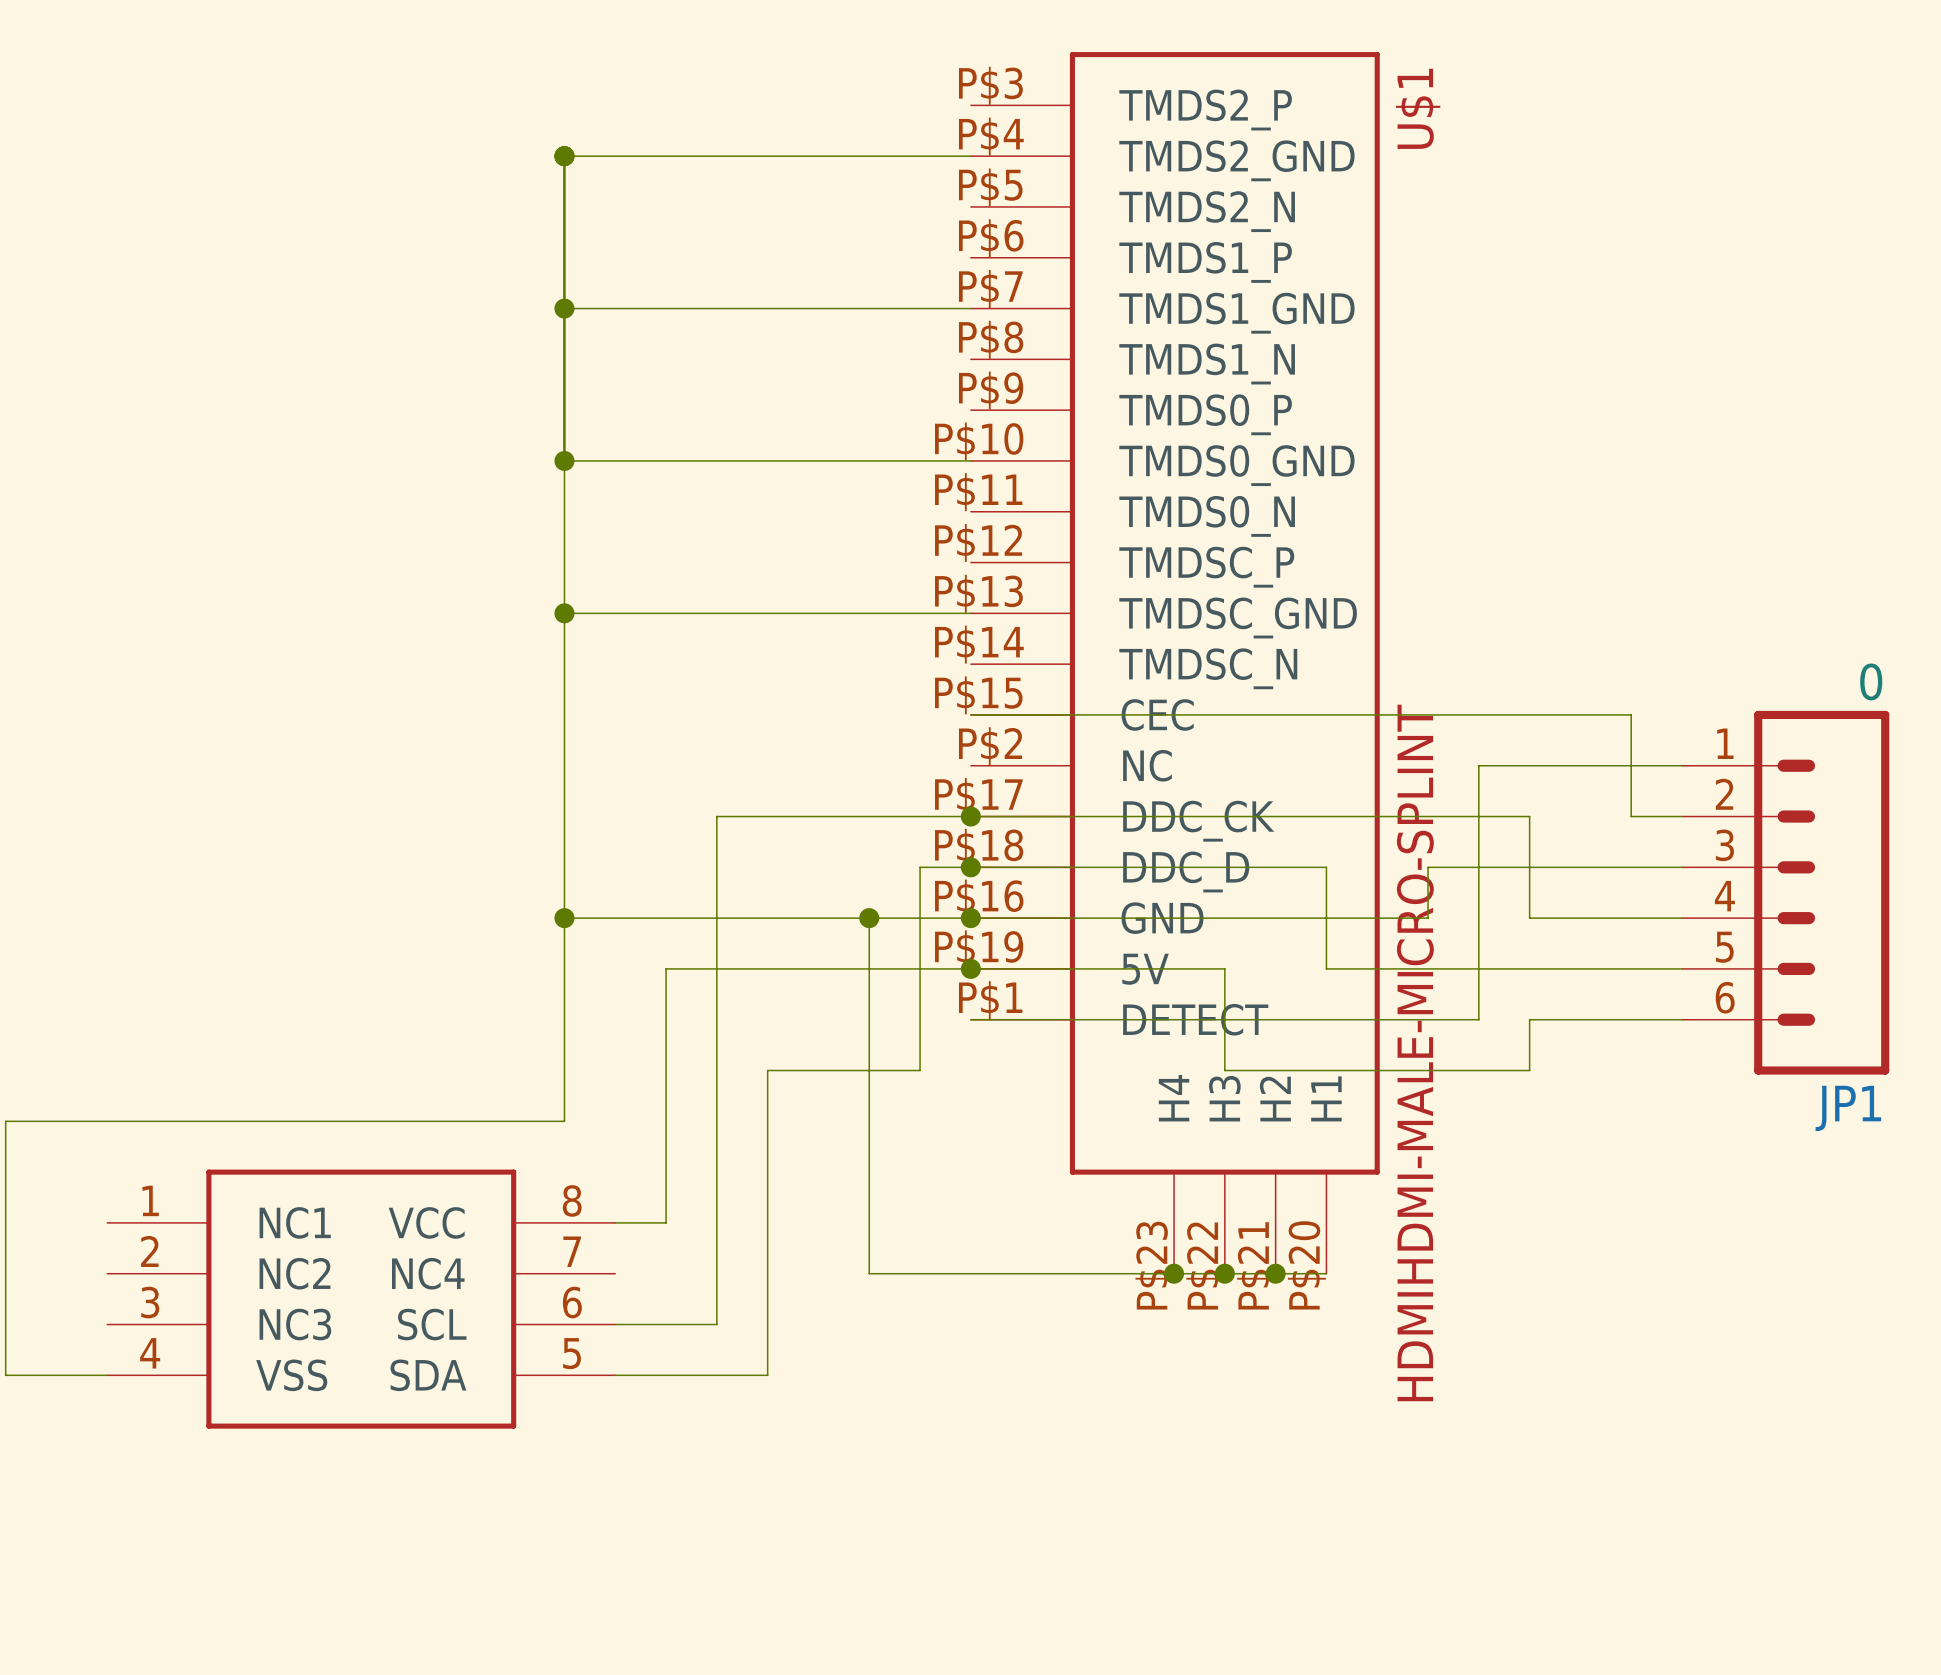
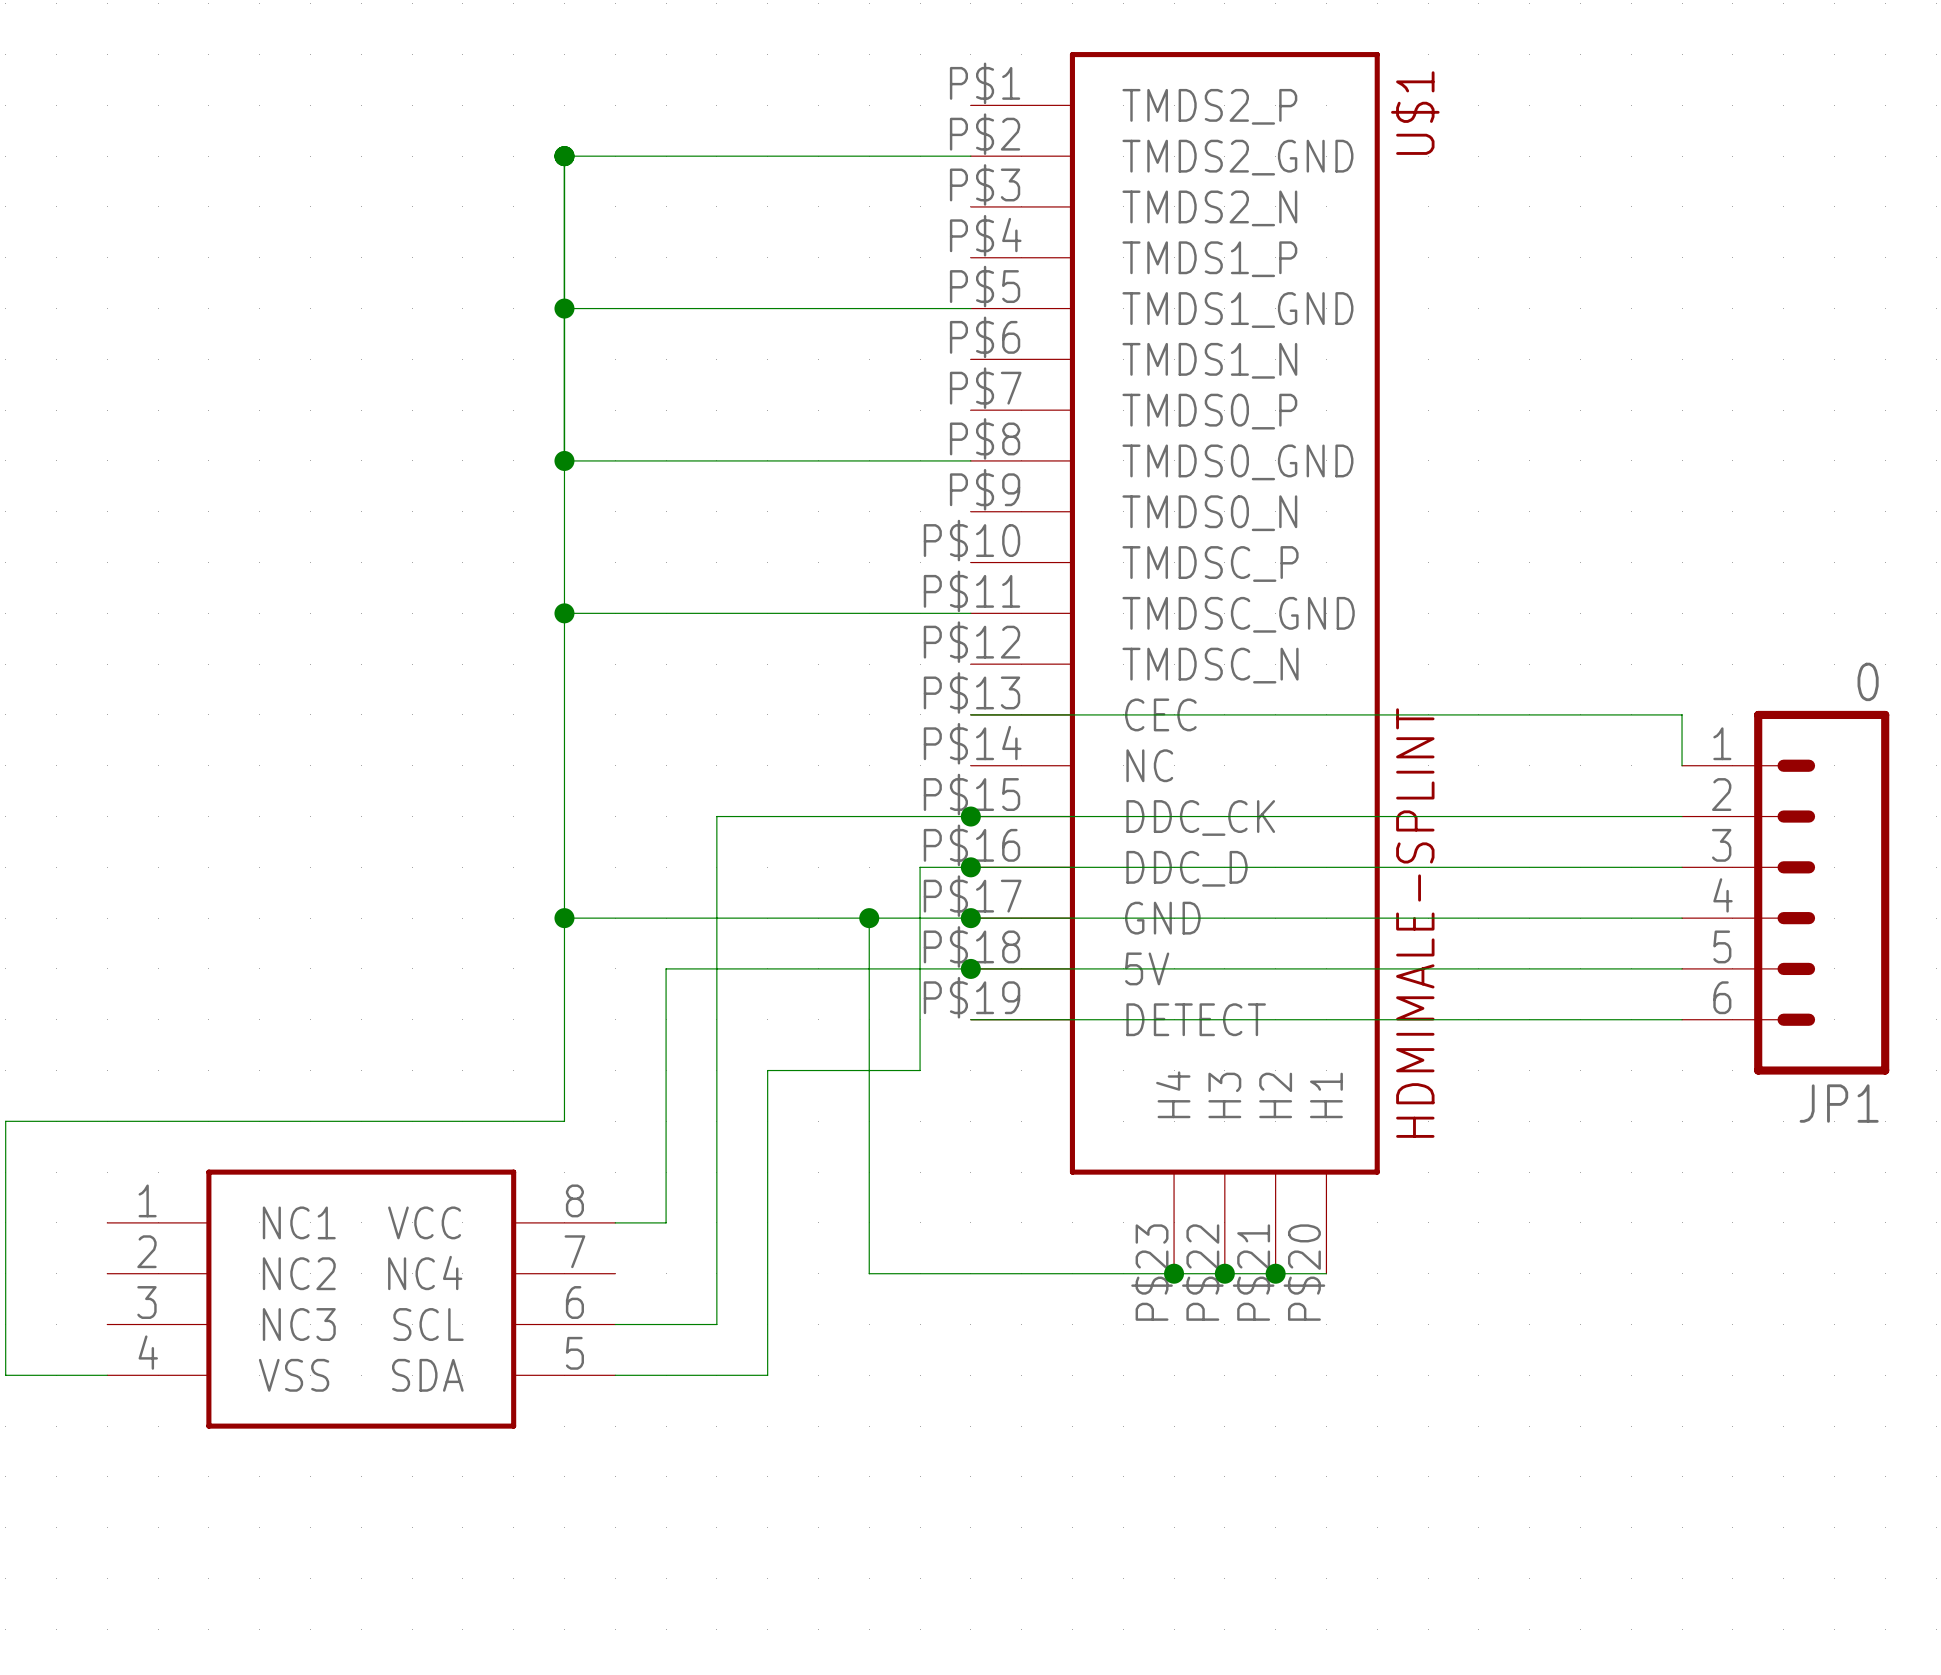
U$1 symbol: [970, 52, 1380, 1274] -> [970, 52, 1380, 1274]
wire: (1631, 714) (1631, 816) -> (1631, 714) (1682, 714) (1682, 765)
wire: (1682, 765) (1478, 765) (1478, 1019) -> none
wire: (1529, 816) (1529, 918) -> (1529, 816) (1631, 816)
wire: (1326, 867) (1326, 968) -> (1224, 968) (1326, 968)
wire: (1428, 867) (1428, 918) -> (1428, 867) (1326, 867)
wire: none -> (1428, 918) (1529, 918)
wire: (1224, 968) (1224, 1070) (1529, 1070) (1529, 1019) -> (1478, 1019) (1529, 1019)
U$1 value: HDMIHDMI-MALE-MICRO-SPLINT (1415, 1052) -> HDMIMALE-SPLINT (1415, 923)

